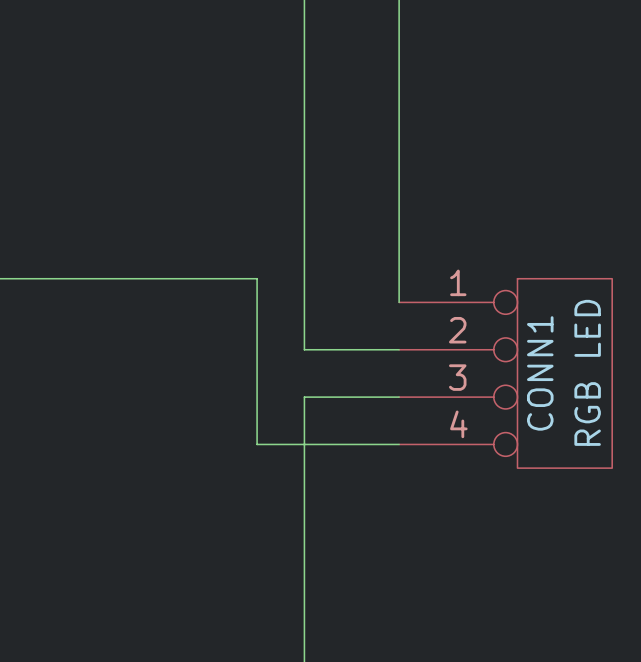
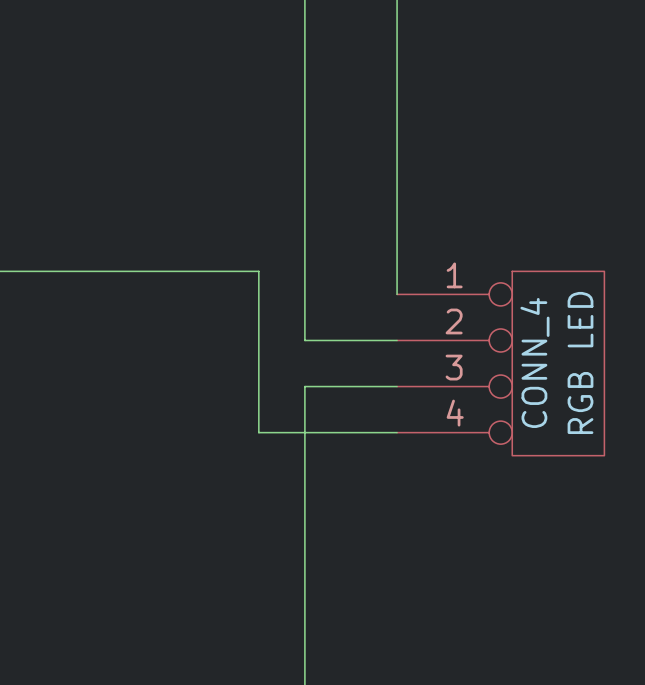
CONN1 name: CONN1 (540, 373) -> CONN_4 (534, 362)

